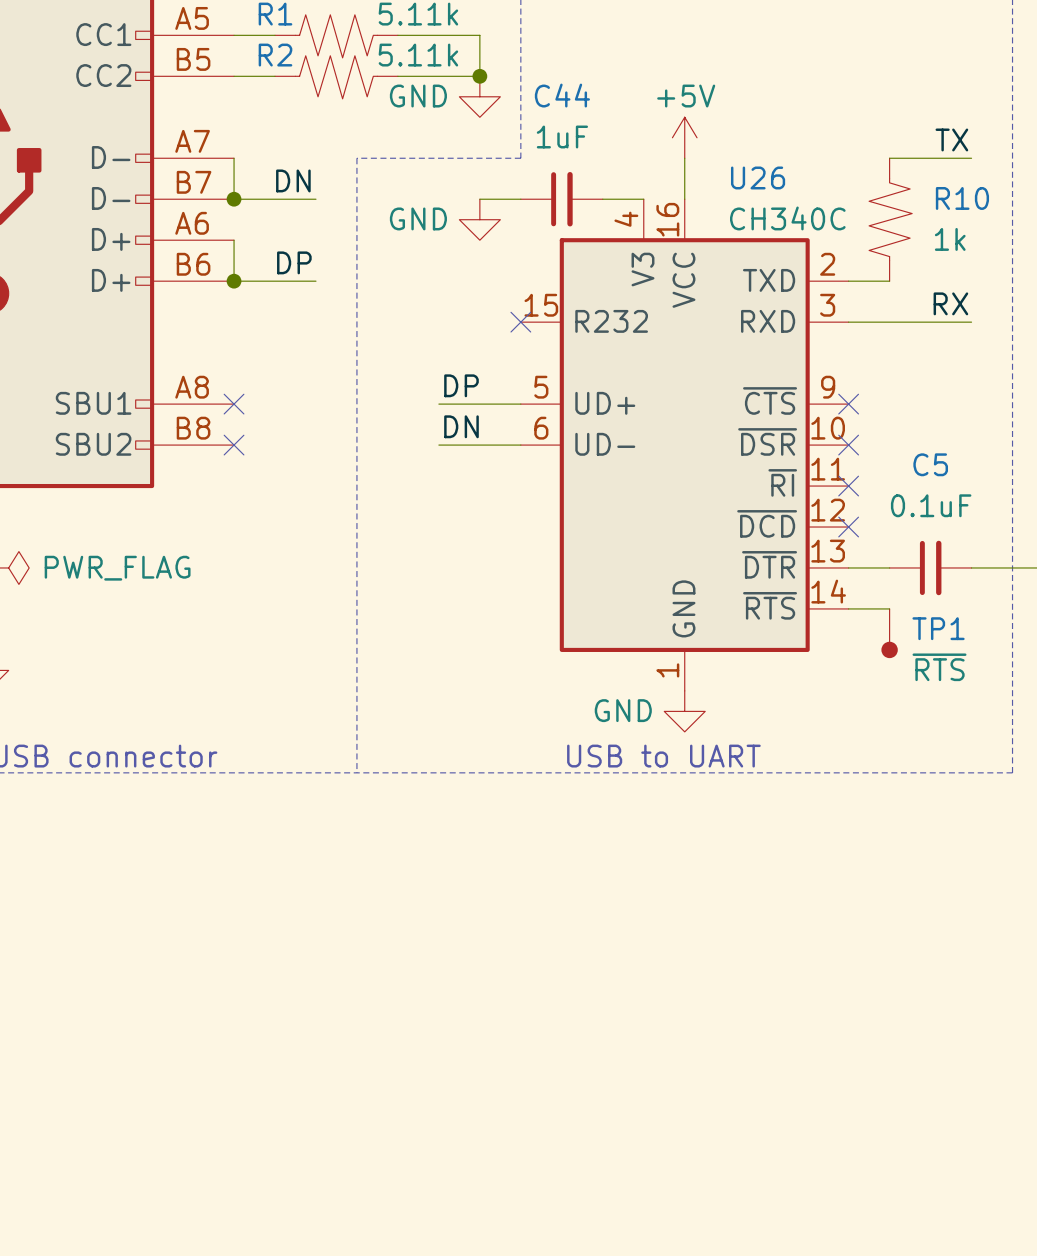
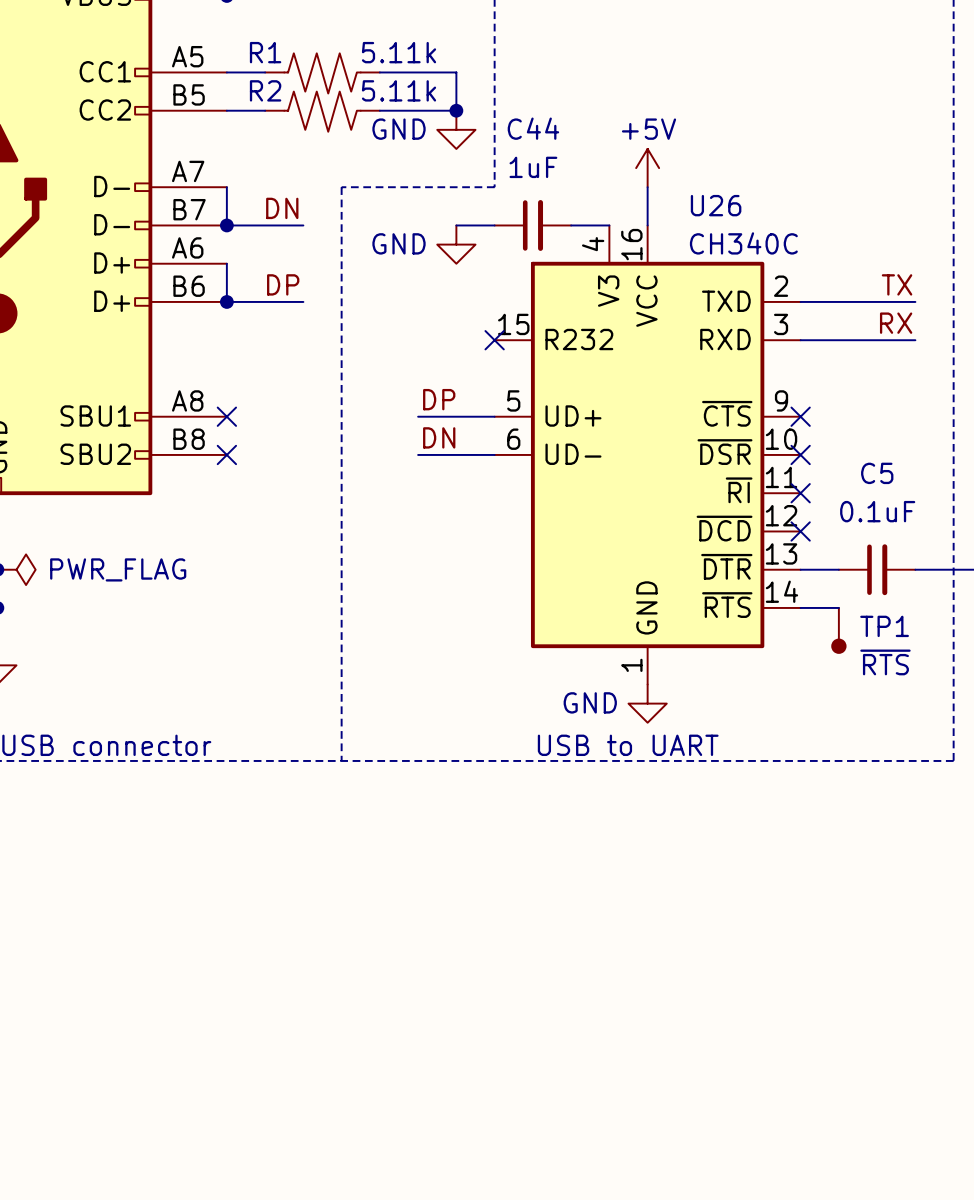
label position: TX (951, 139) -> TX (897, 284)
wire: (889, 158) (971, 158) -> (838, 301) (915, 301)
R10: 1k (890, 219) -> none

